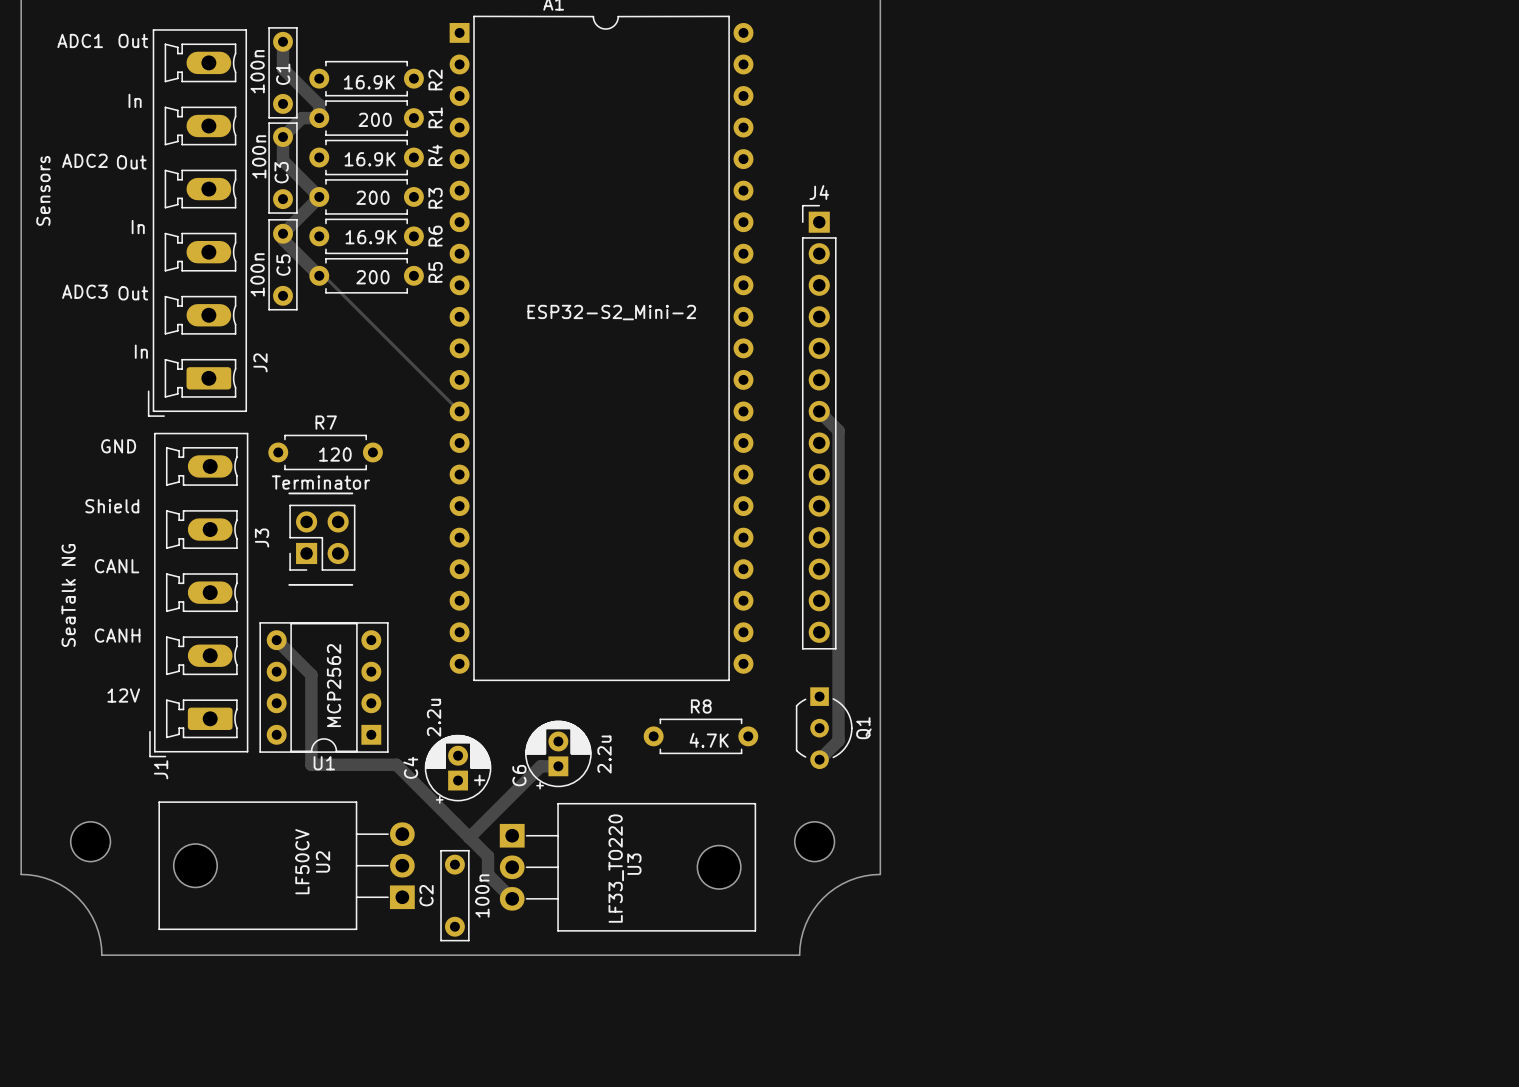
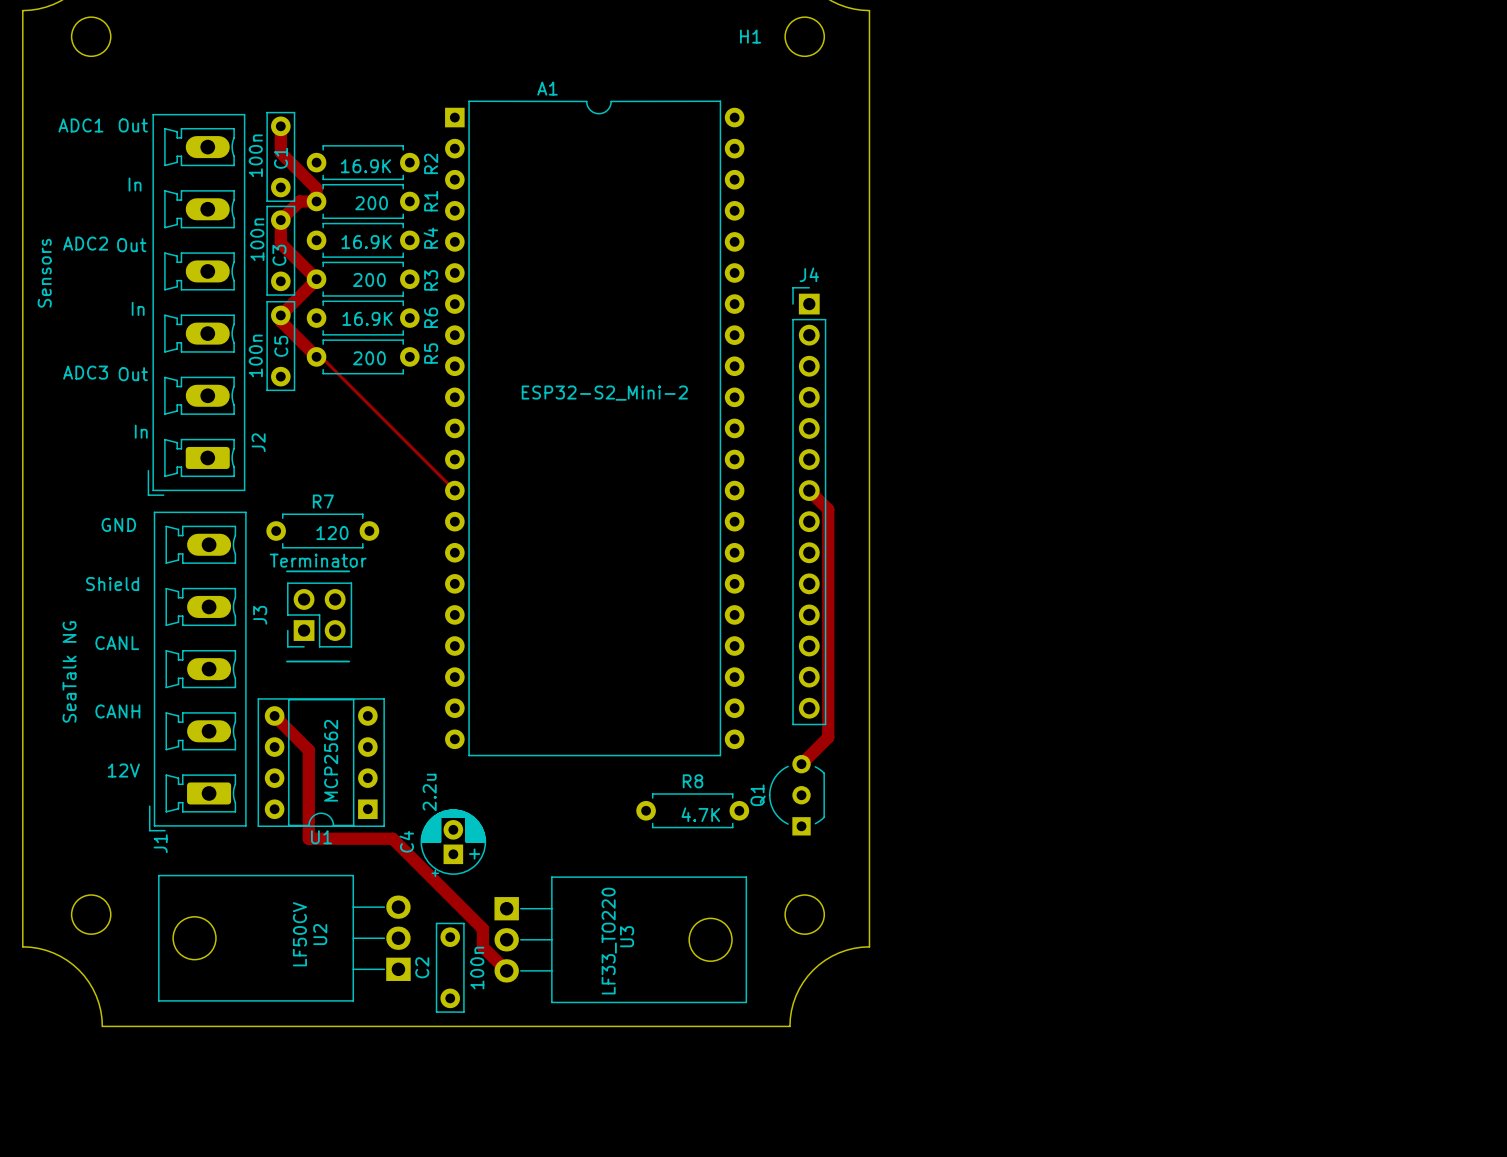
track: (838, 661) (838, 740) (819, 759) -> (828, 737) (801, 764)
Q1 rotation: 0° (824, 728) -> 180° (796, 795)
C6: 2.2u (558, 755) -> none
track: (558, 766) (540, 766) (469, 837) -> none

